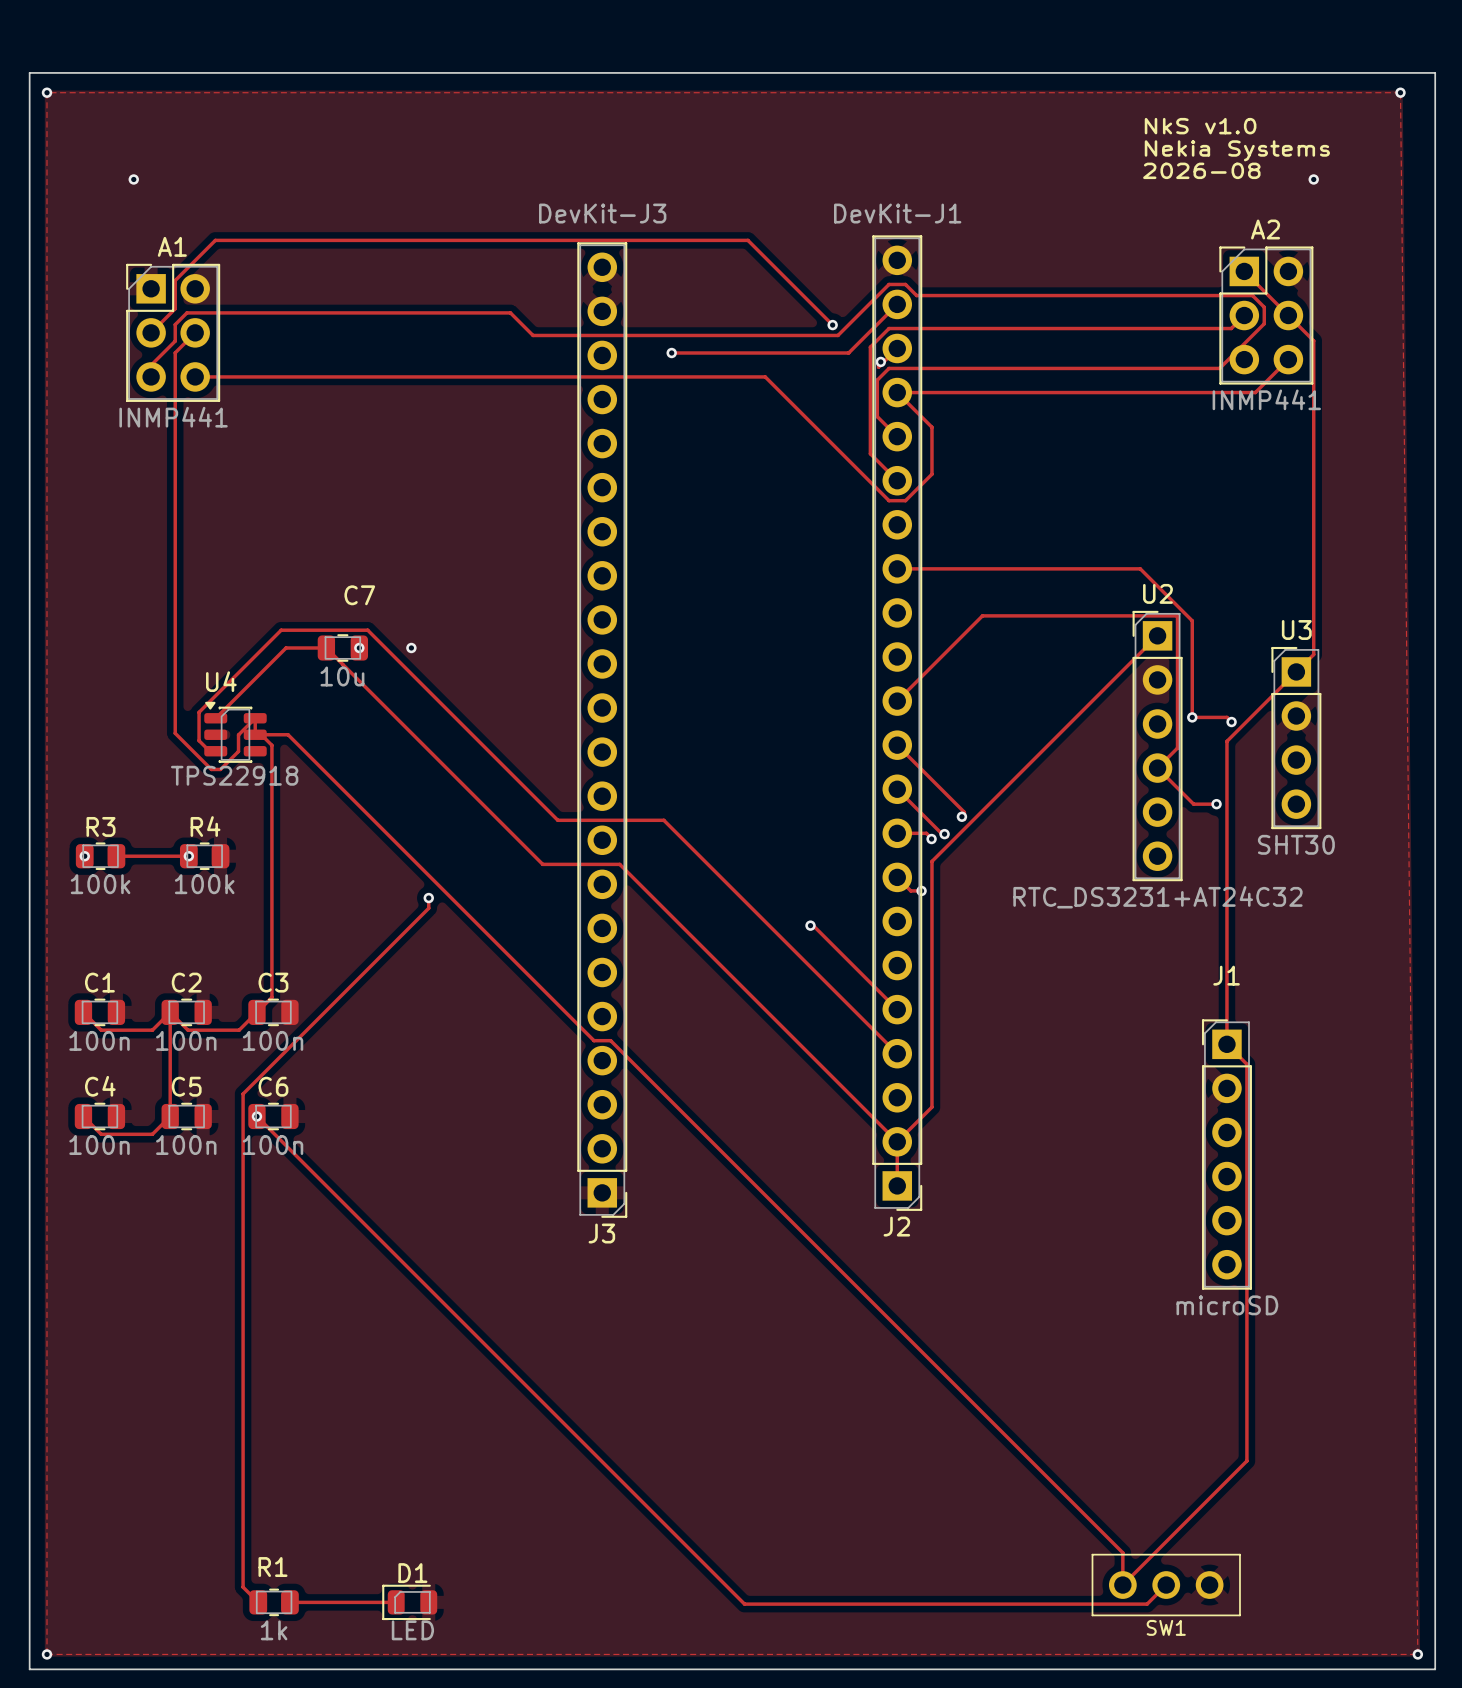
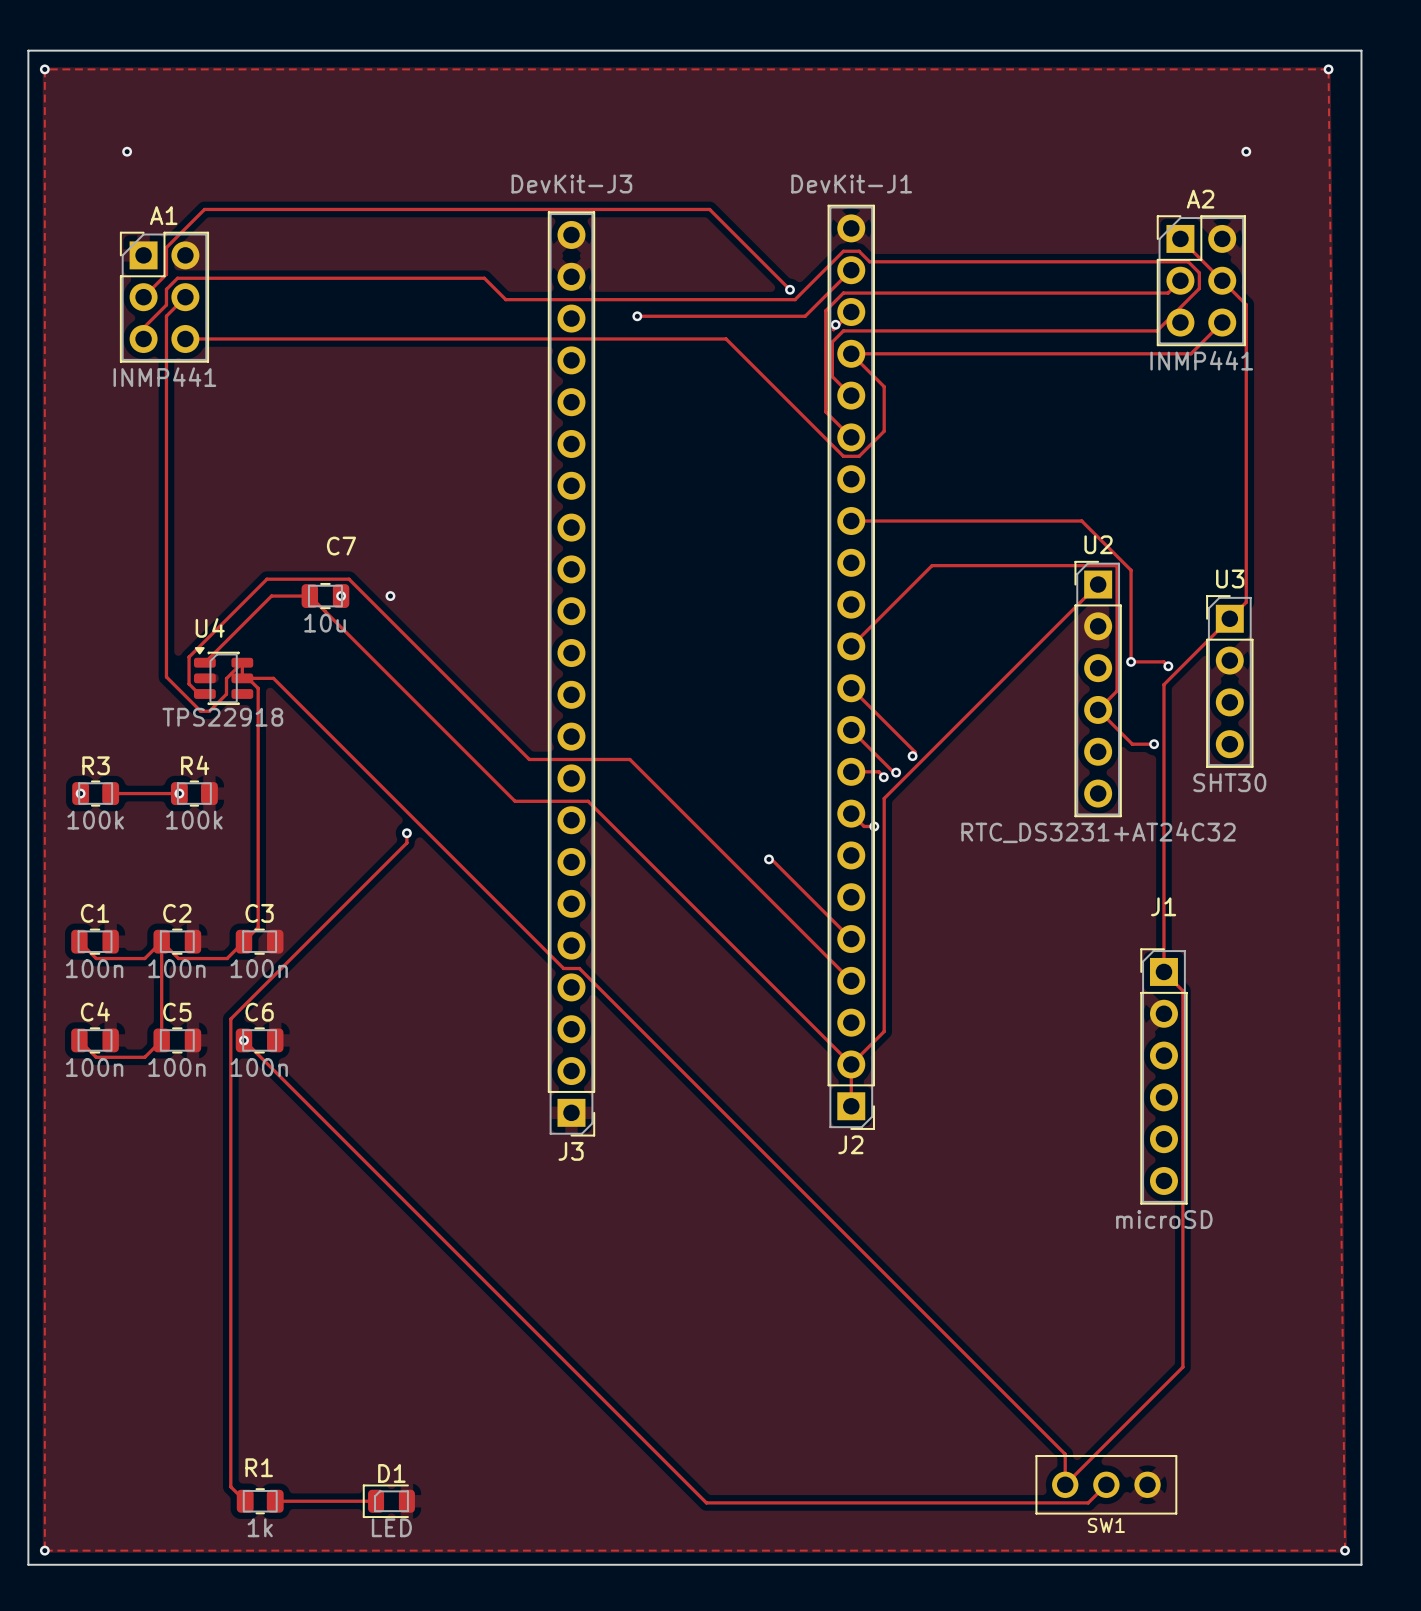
text: NkS v1.0 (1200, 126) -> none
text: Nekia Systems (1237, 150) -> none
text: 2026-08 (1201, 170) -> none

